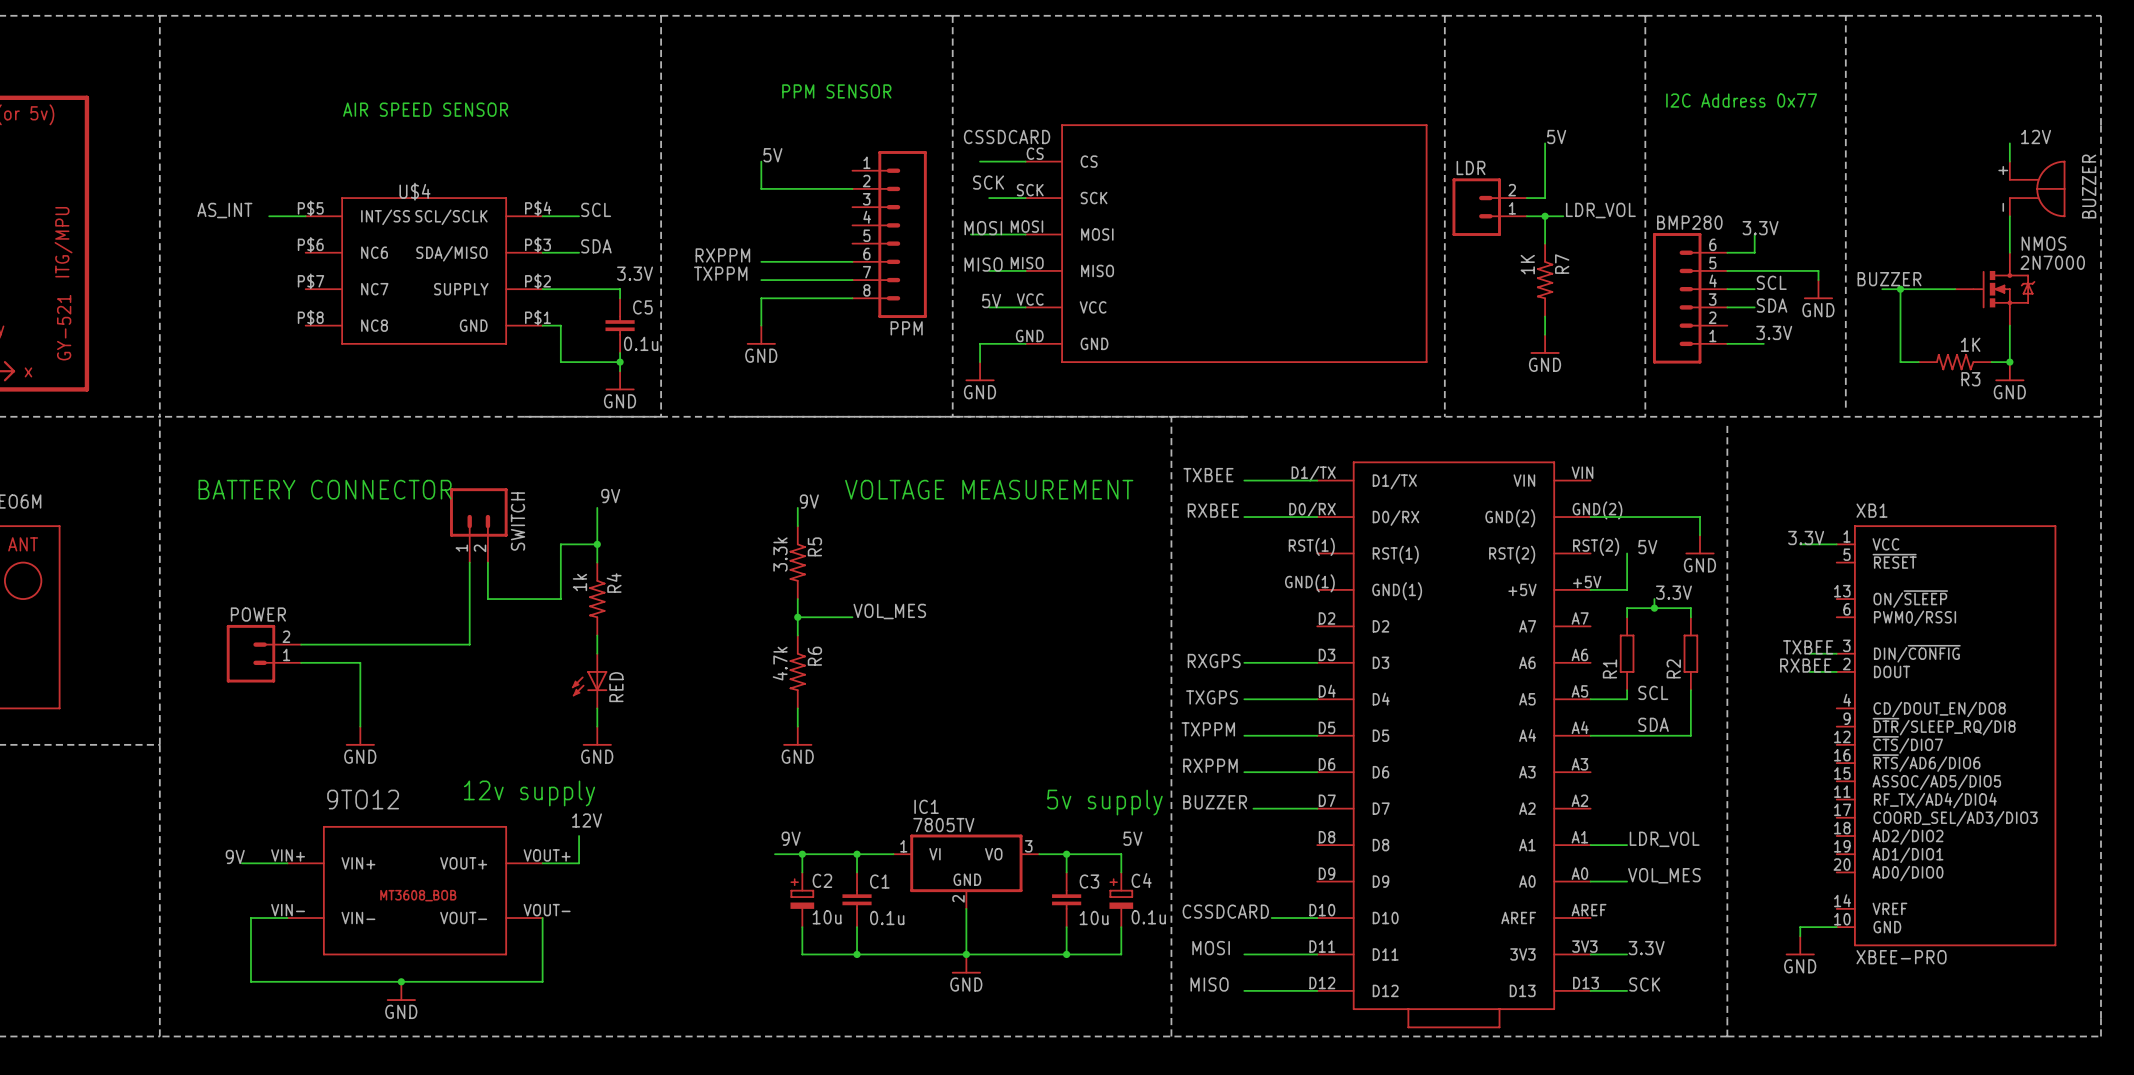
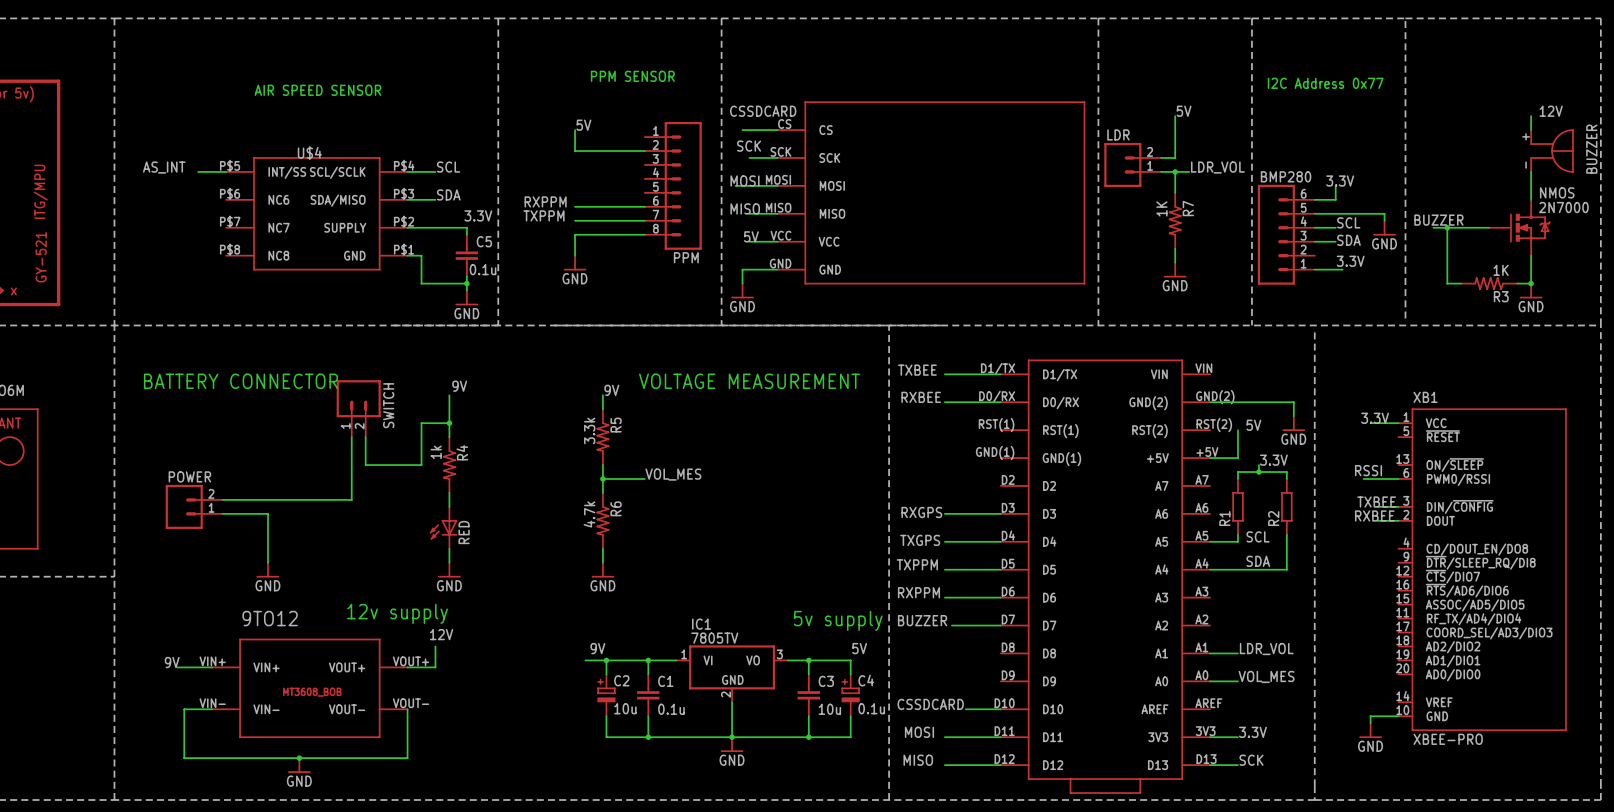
label: none -> RSSI (1368, 470)
wire: none -> (1363, 478) (1398, 478)

